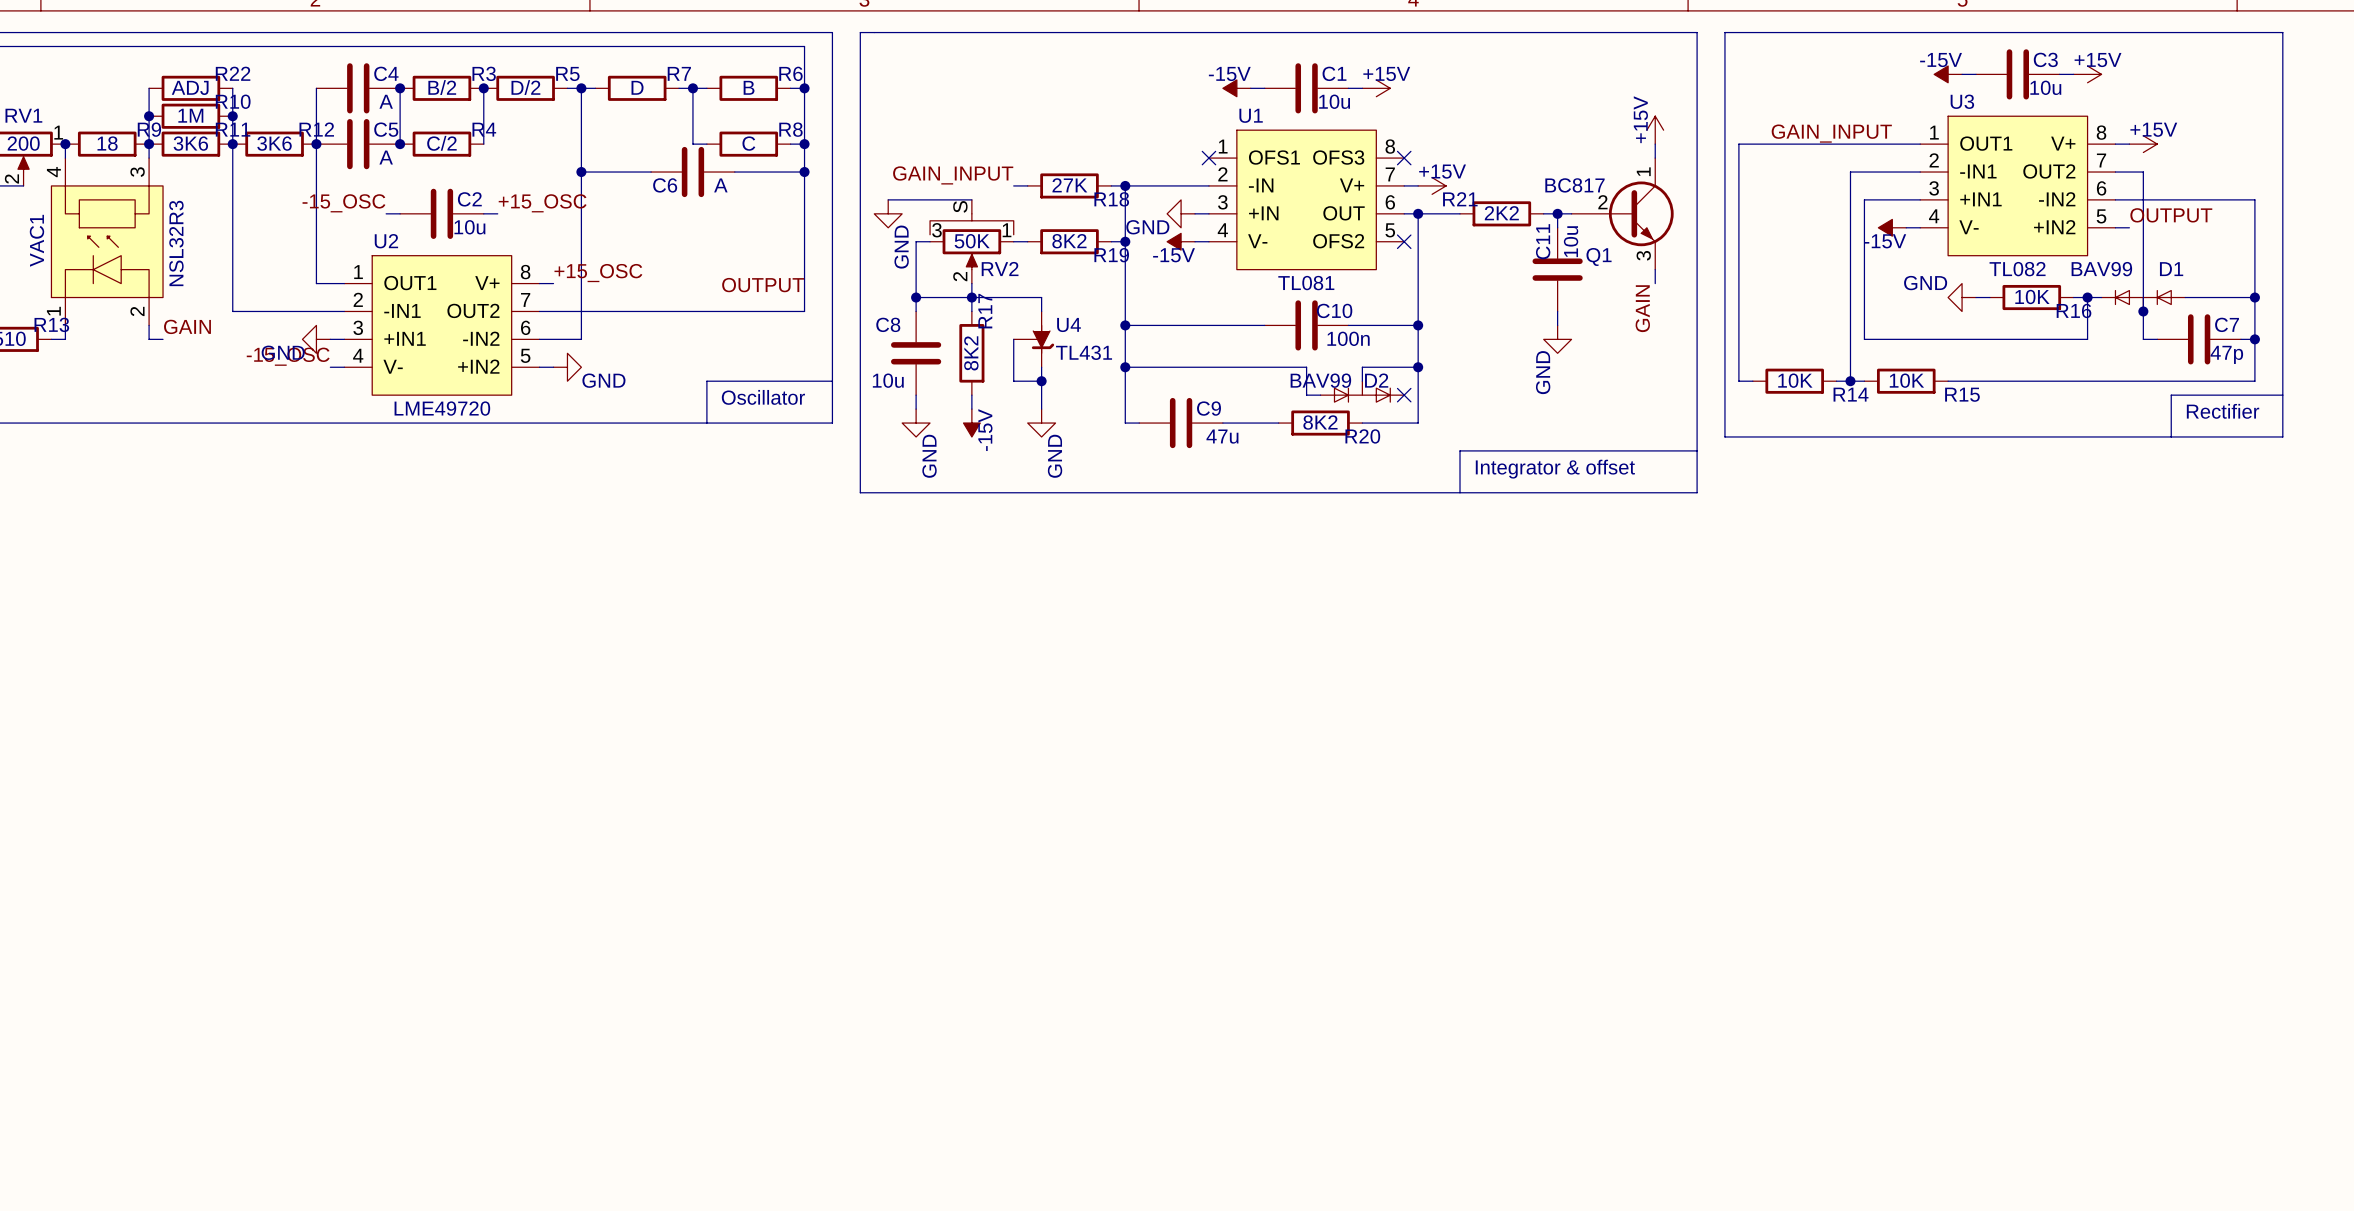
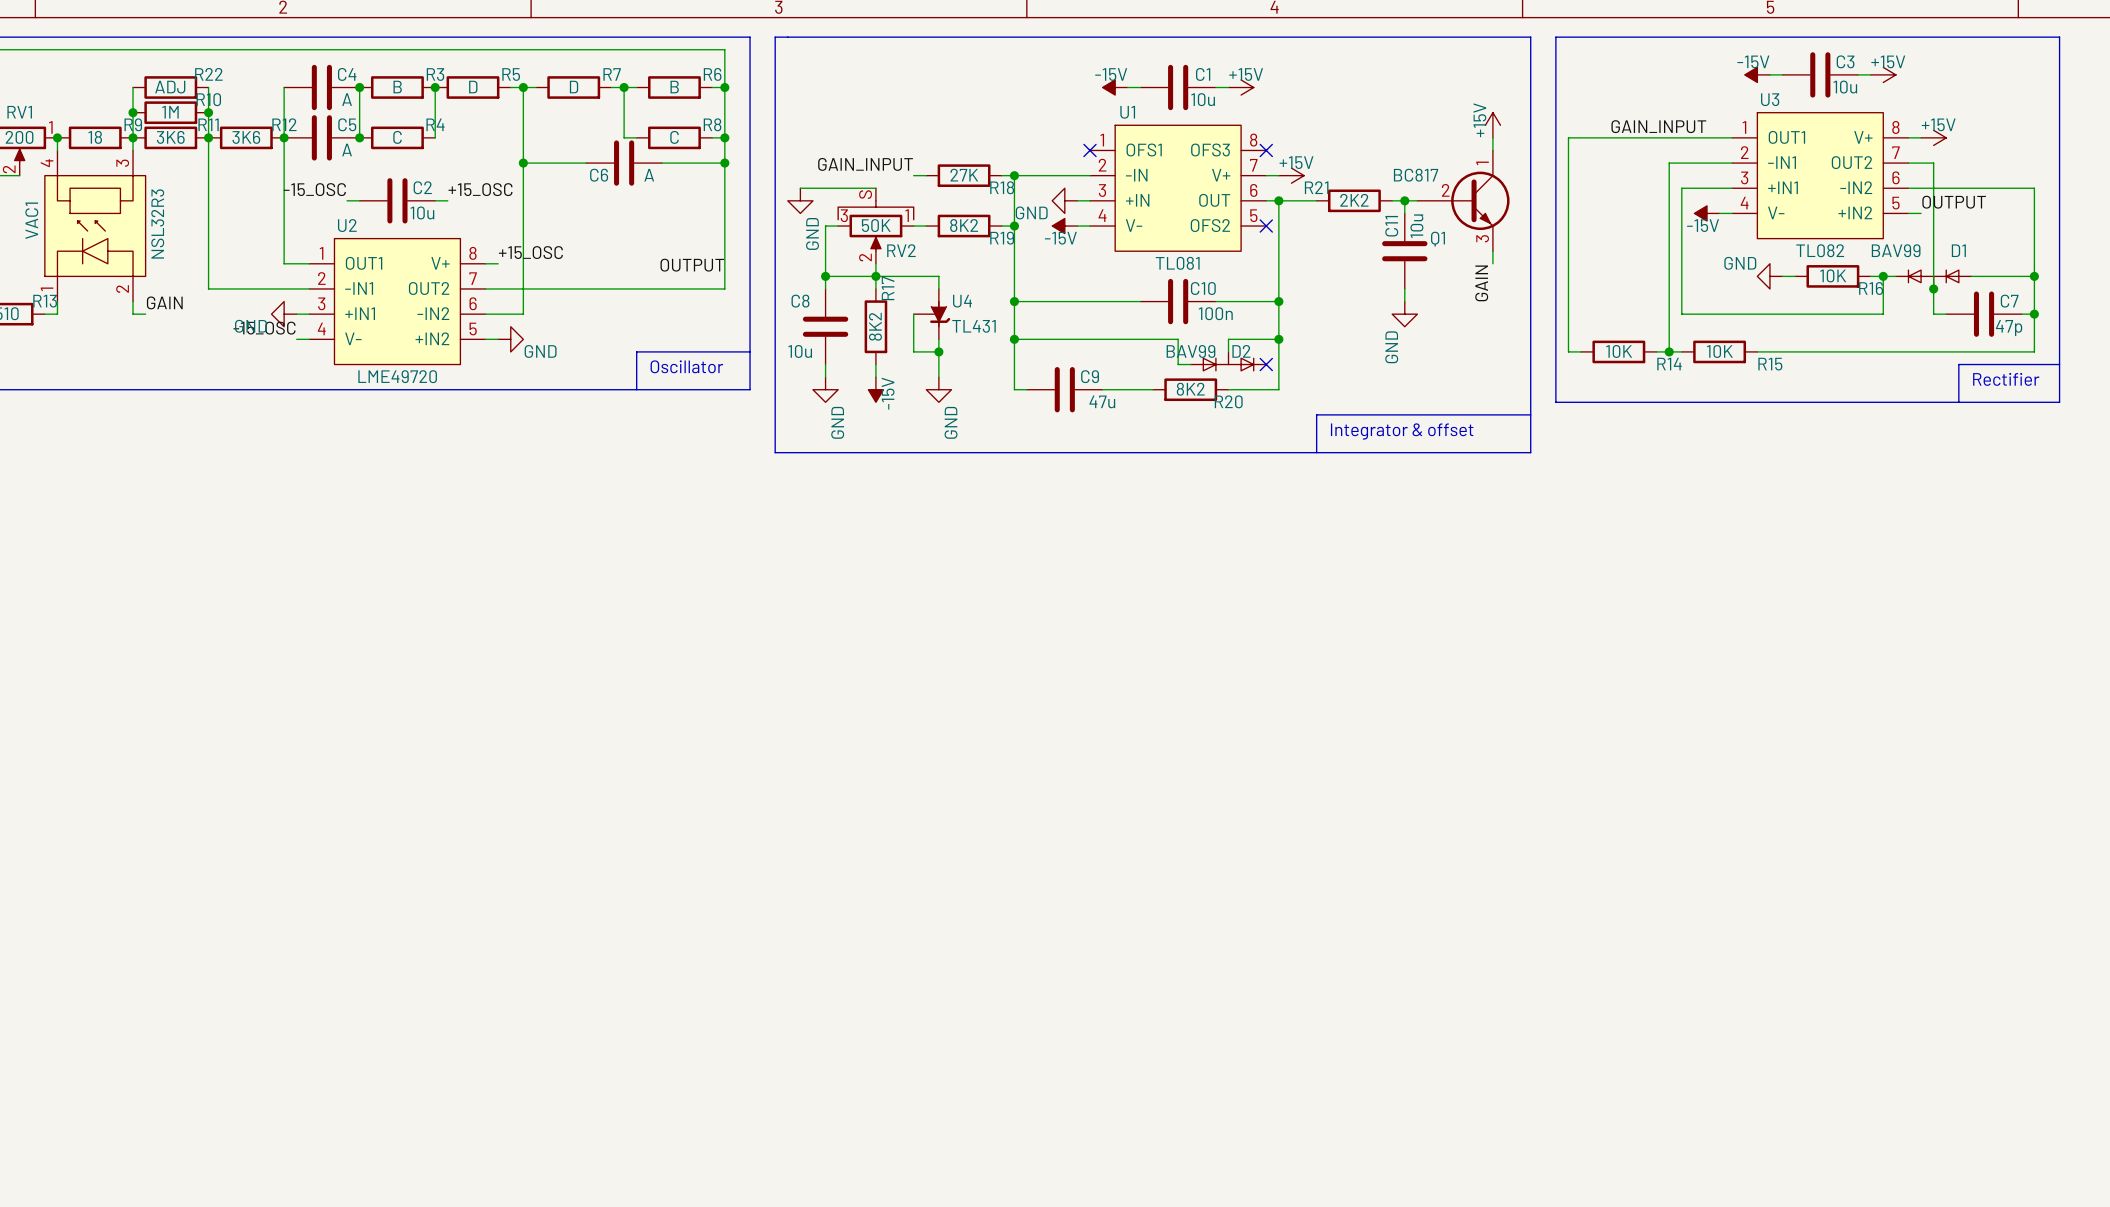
R3 value: B/2 (442, 87) -> B (397, 87)
R5 value: D/2 (525, 87) -> D (473, 87)
R4 value: C/2 (441, 143) -> C (397, 137)

